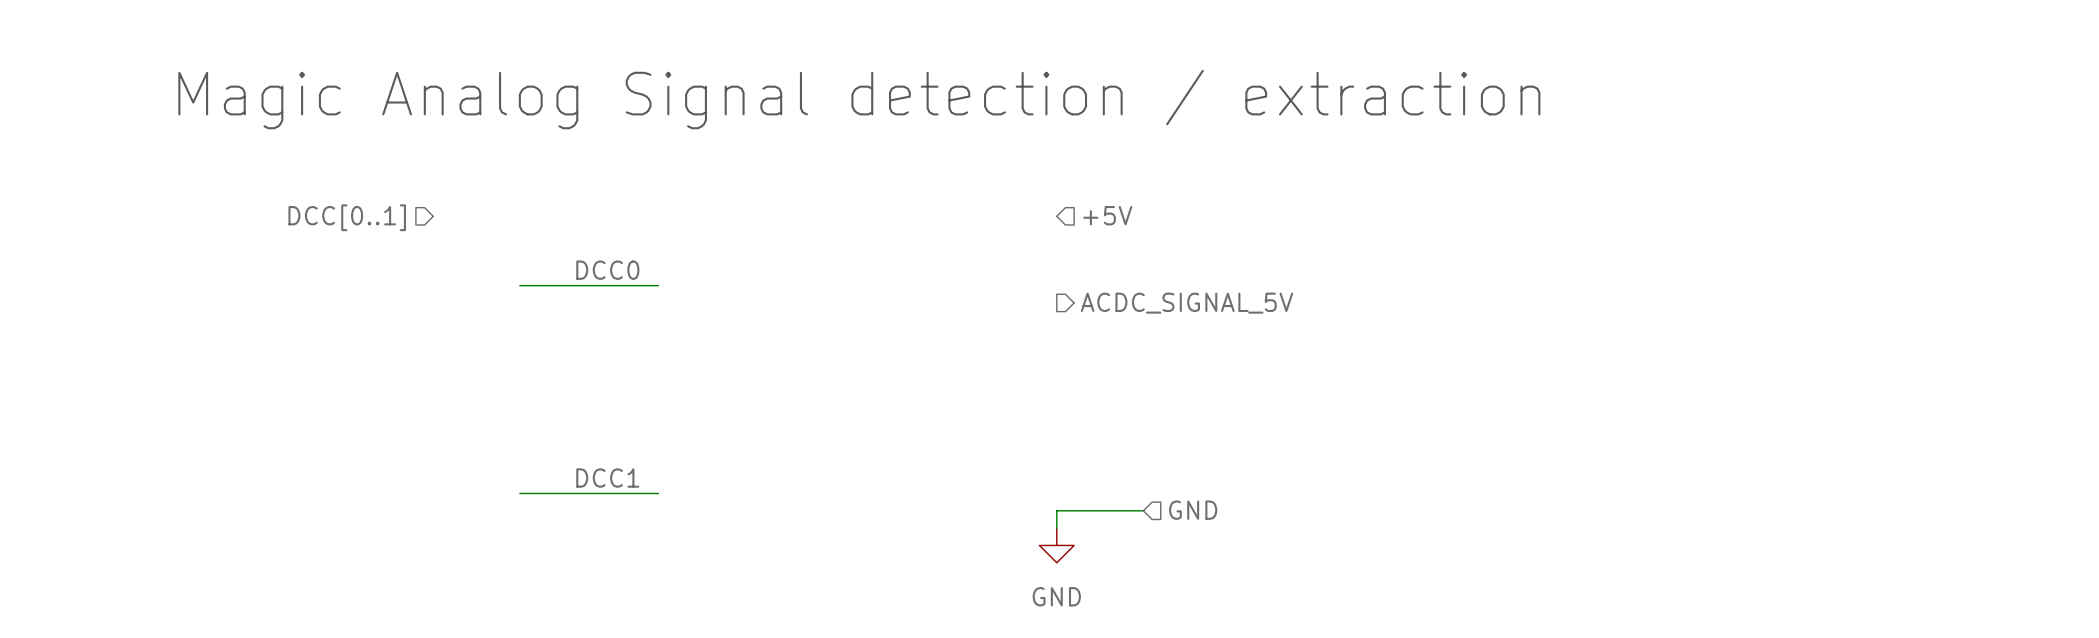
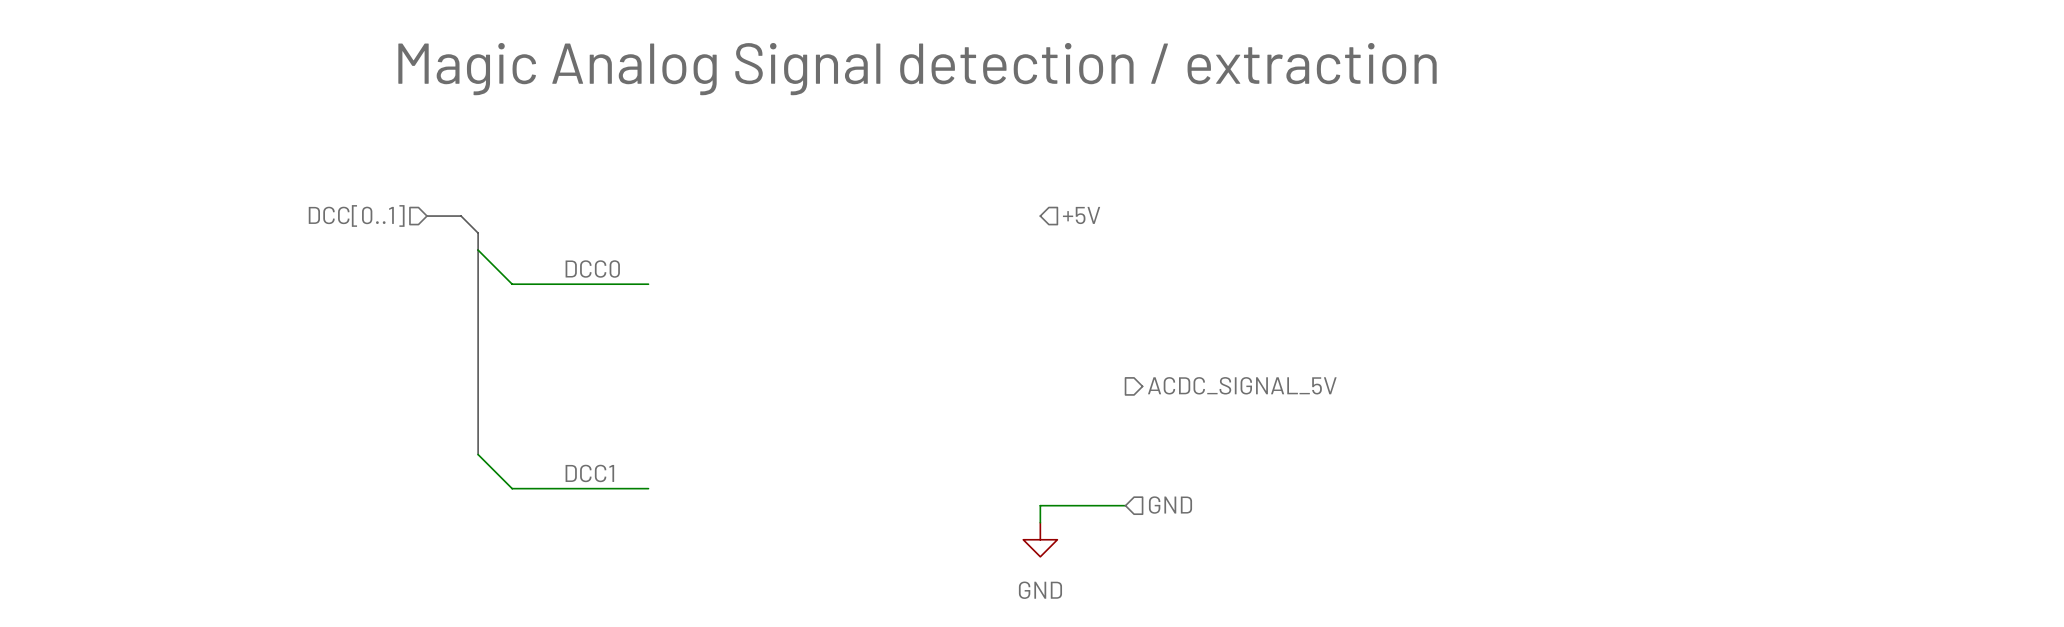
label: none -> Magic Analog Signal detection / extraction (917, 69)
text: Magic Analog Signal detection / extraction (859, 99) -> none
bus: none -> (427, 216) (461, 216) (478, 233) (478, 454)
wire: none -> (478, 250) (512, 284)
hierarchical label position: ACDC_SIGNAL_5V (1186, 303) -> ACDC_SIGNAL_5V (1242, 385)
wire: none -> (478, 454) (512, 488)

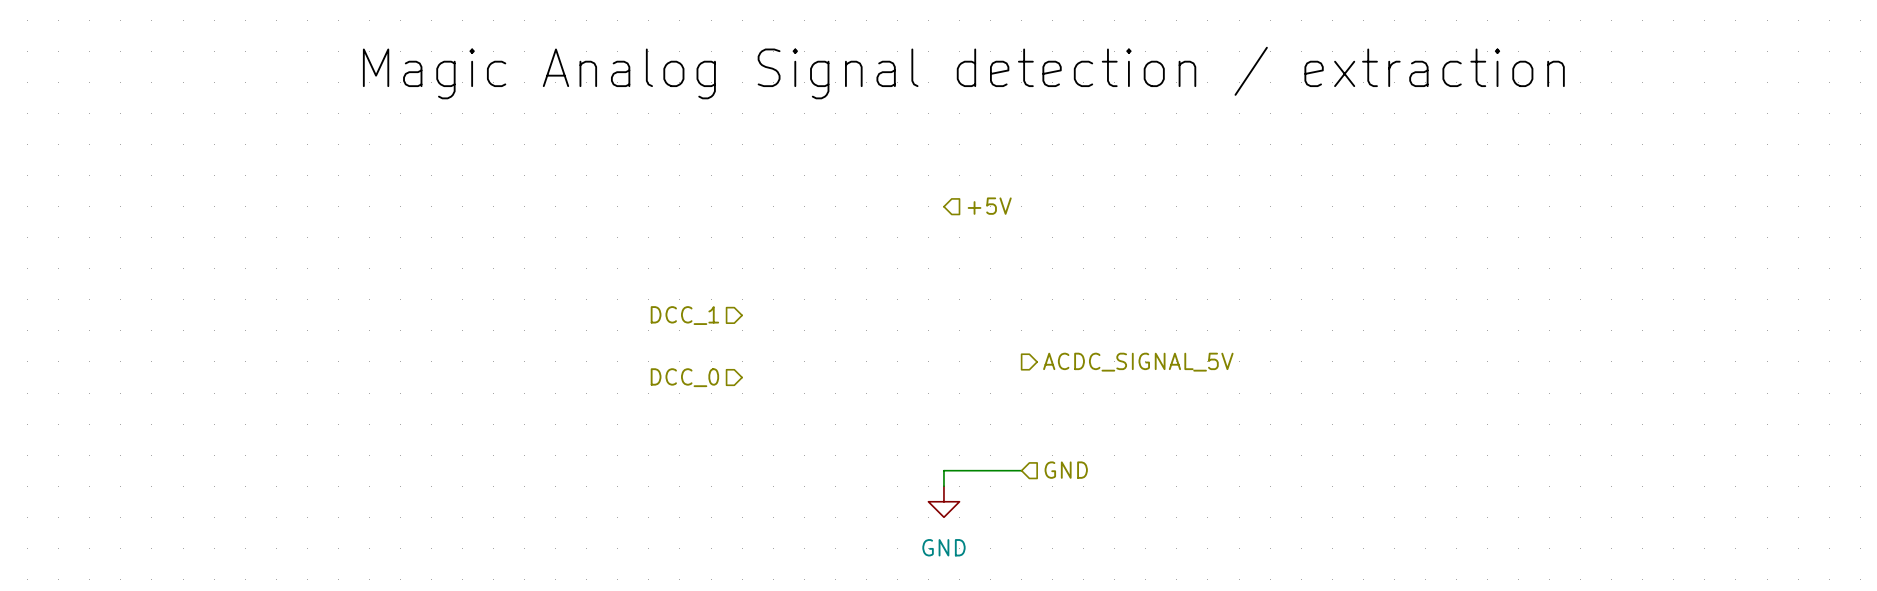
hierarchical label: DCC[0..1] (356, 215) -> none
bus: (427, 216) (461, 216) (478, 233) (478, 454) -> none
wire: (478, 250) (512, 284) (648, 284) -> none
label: DCC0 (592, 269) -> none
hierarchical label: none -> DCC_1 (684, 315)
hierarchical label: none -> DCC_0 (684, 377)
wire: (478, 454) (512, 488) (648, 488) -> none
label: DCC1 (589, 473) -> none

